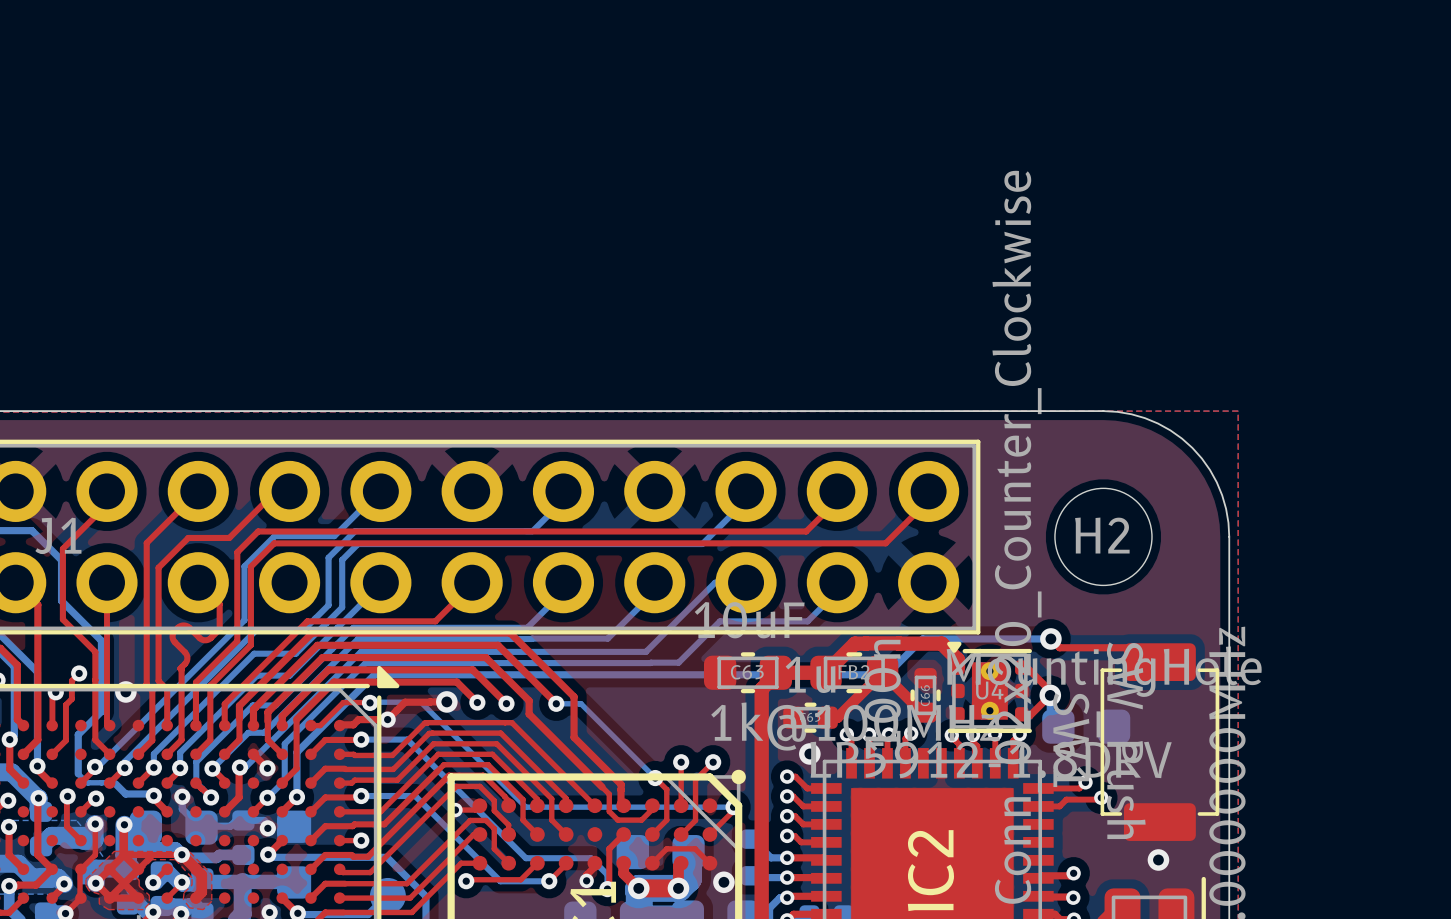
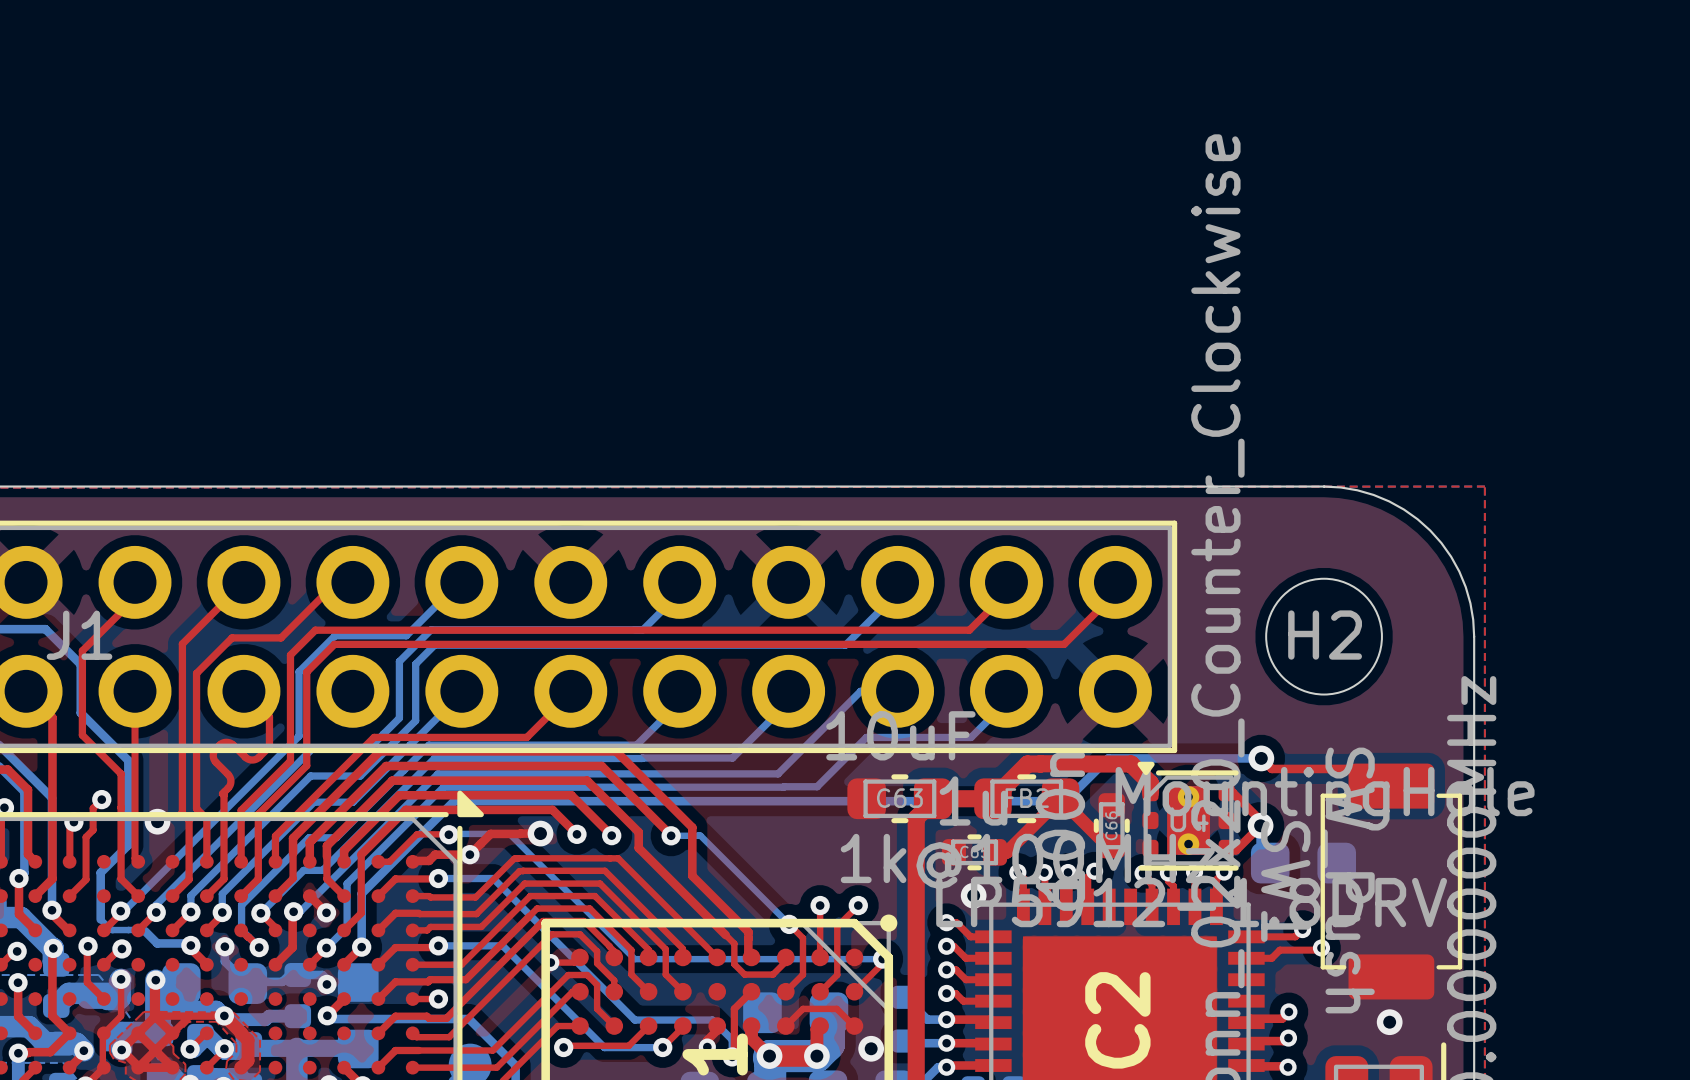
top track: none -> (1288, 1011) (1282, 1018) (1250, 1018) (1246, 1023)
via: none -> (1288, 1011)

